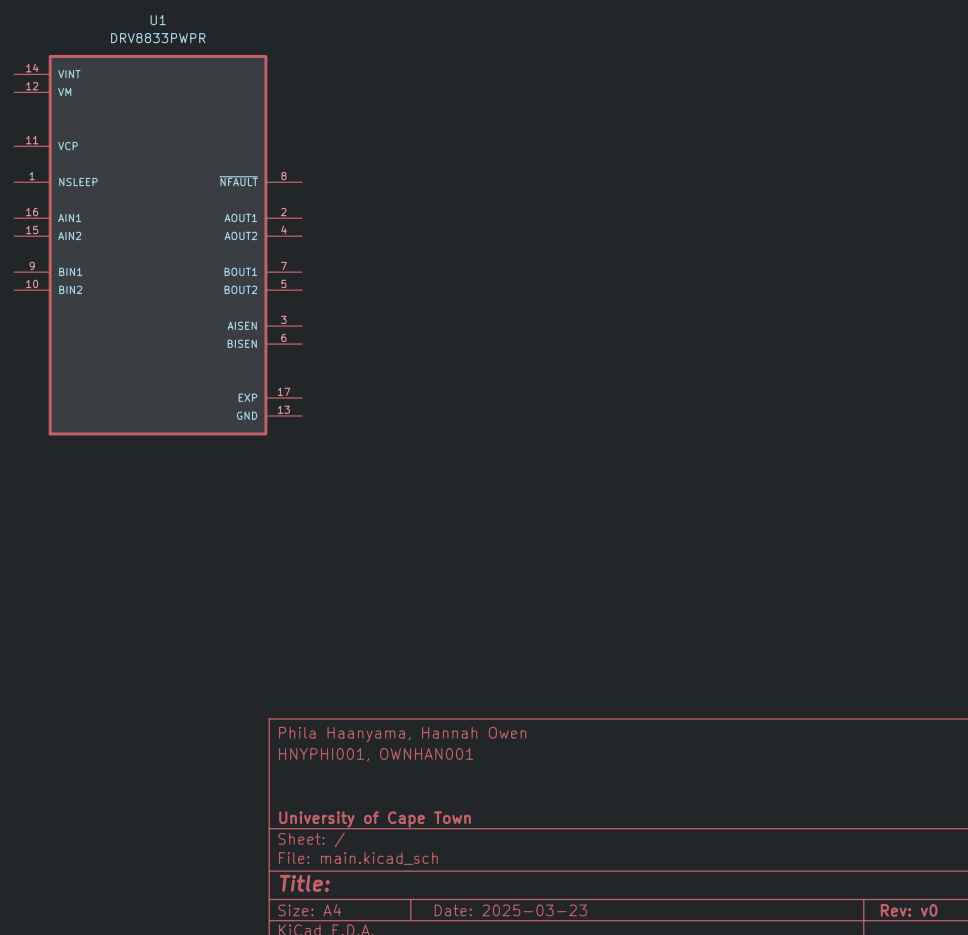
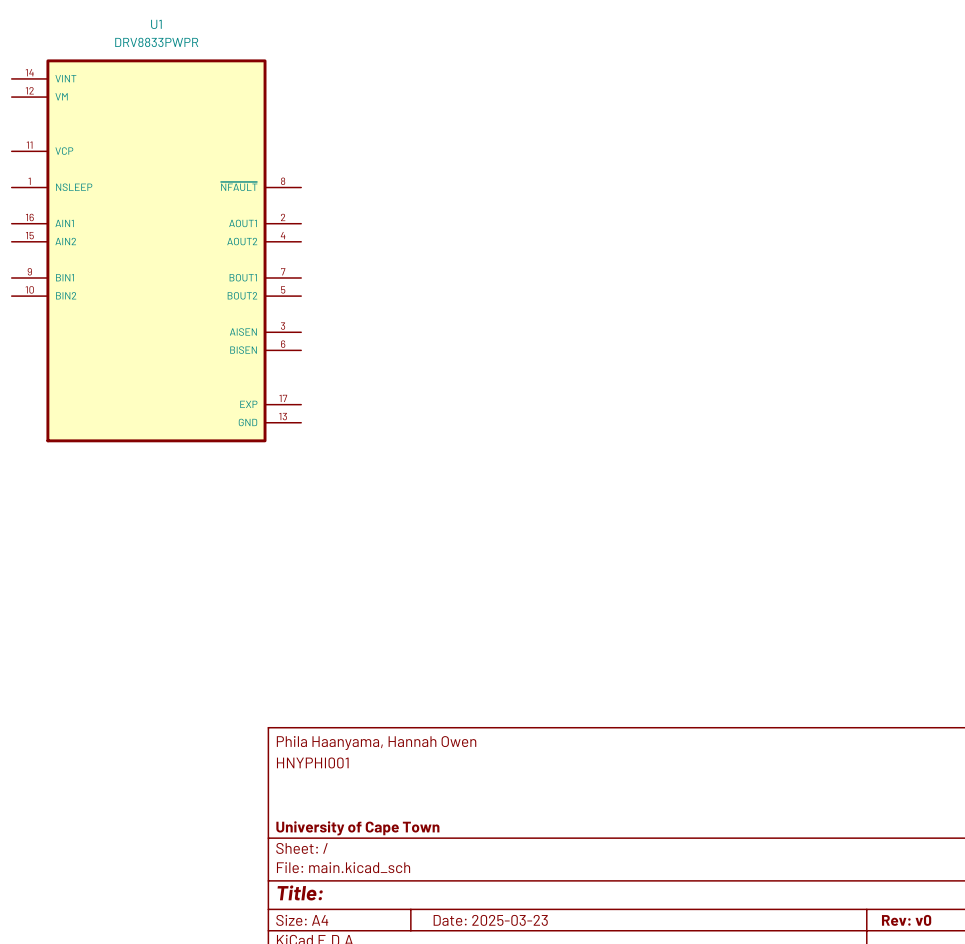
title block: HNYPHI001, OWNHAN001 (376, 754) -> HNYPHI001 (312, 762)

